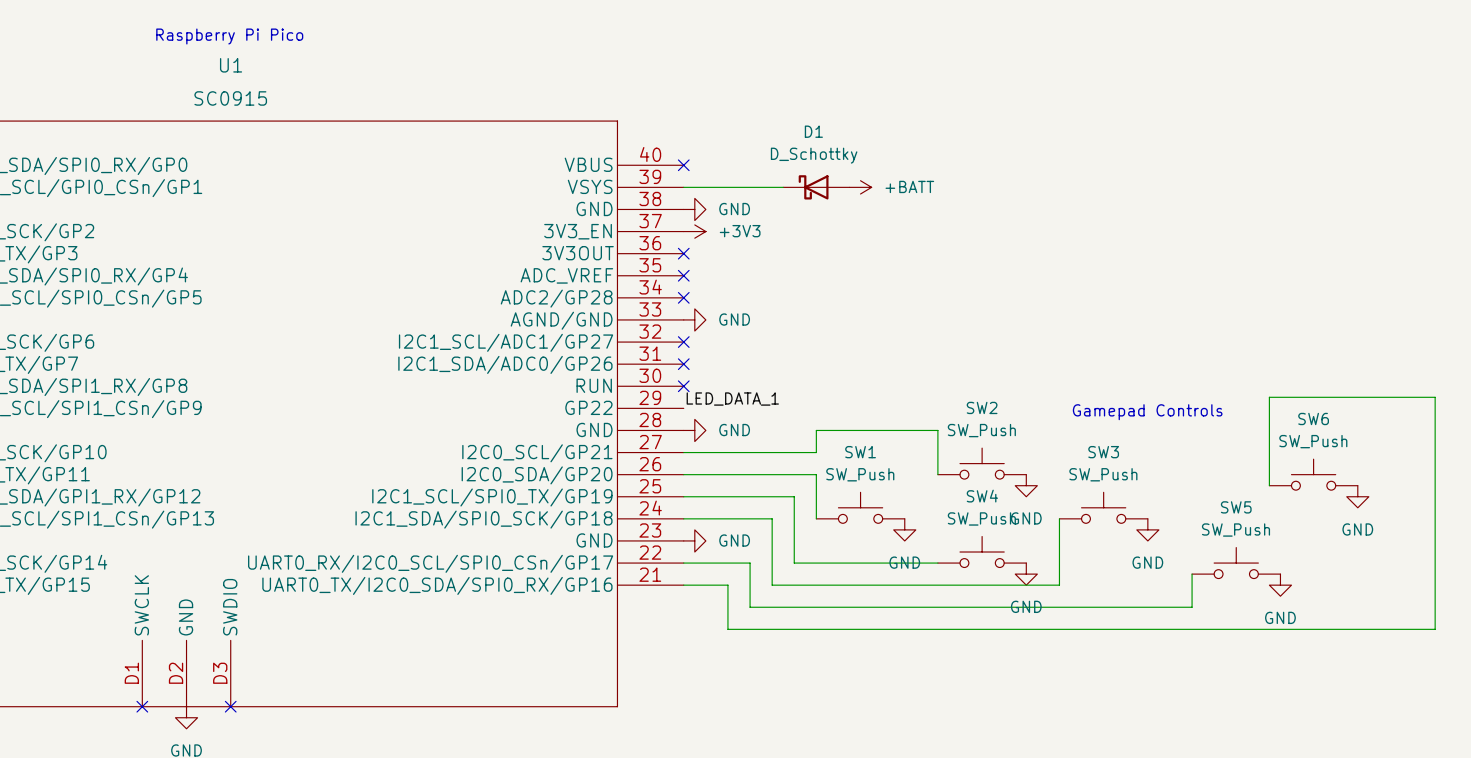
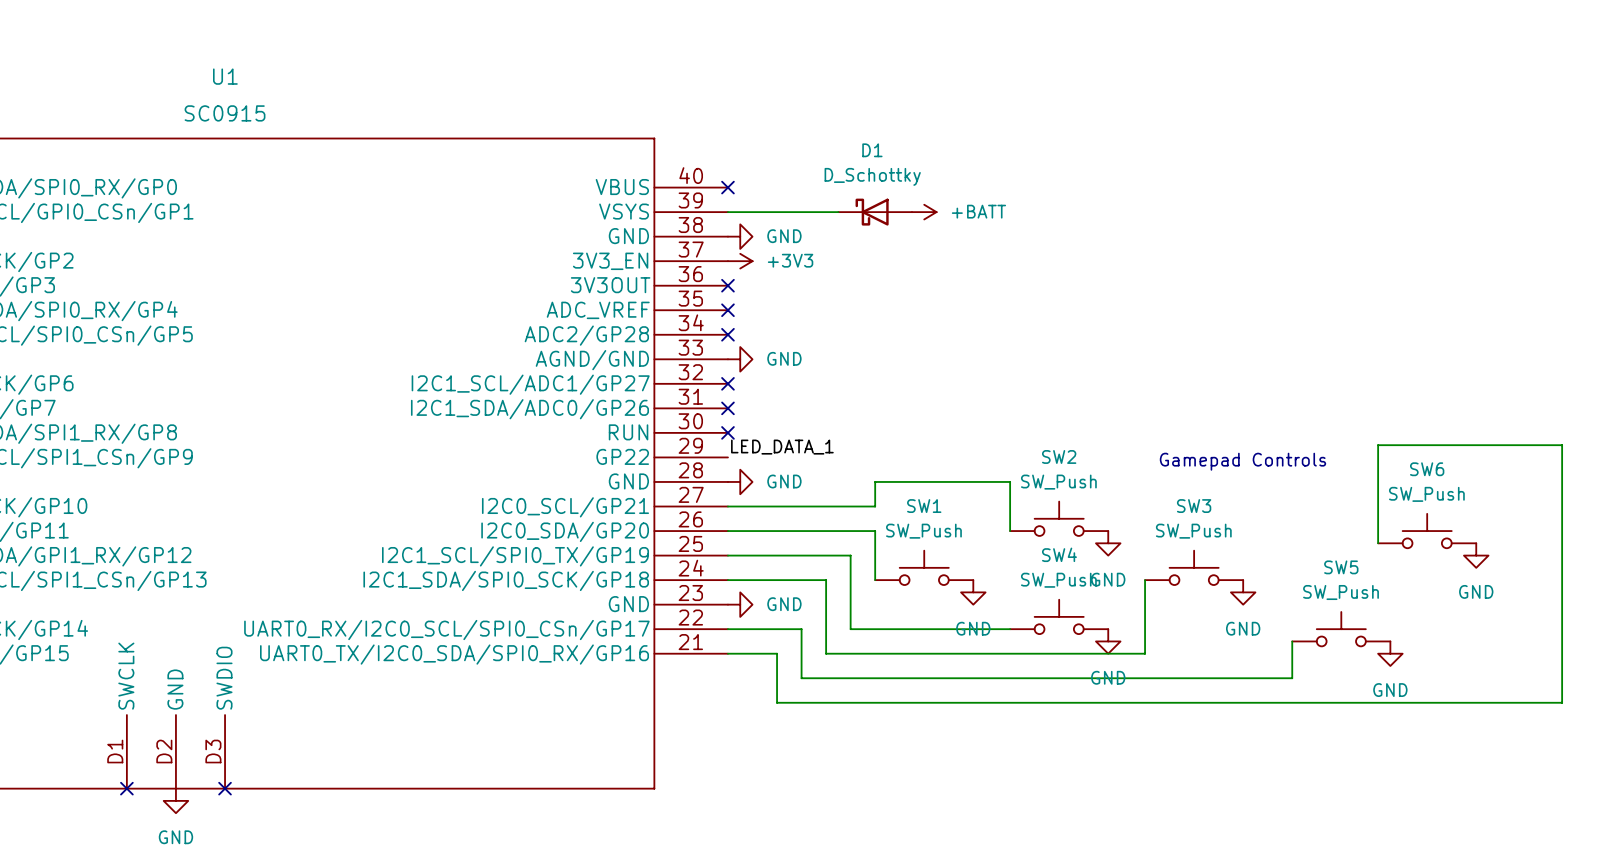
text: Raspberry Pi Pico (229, 36) -> none

